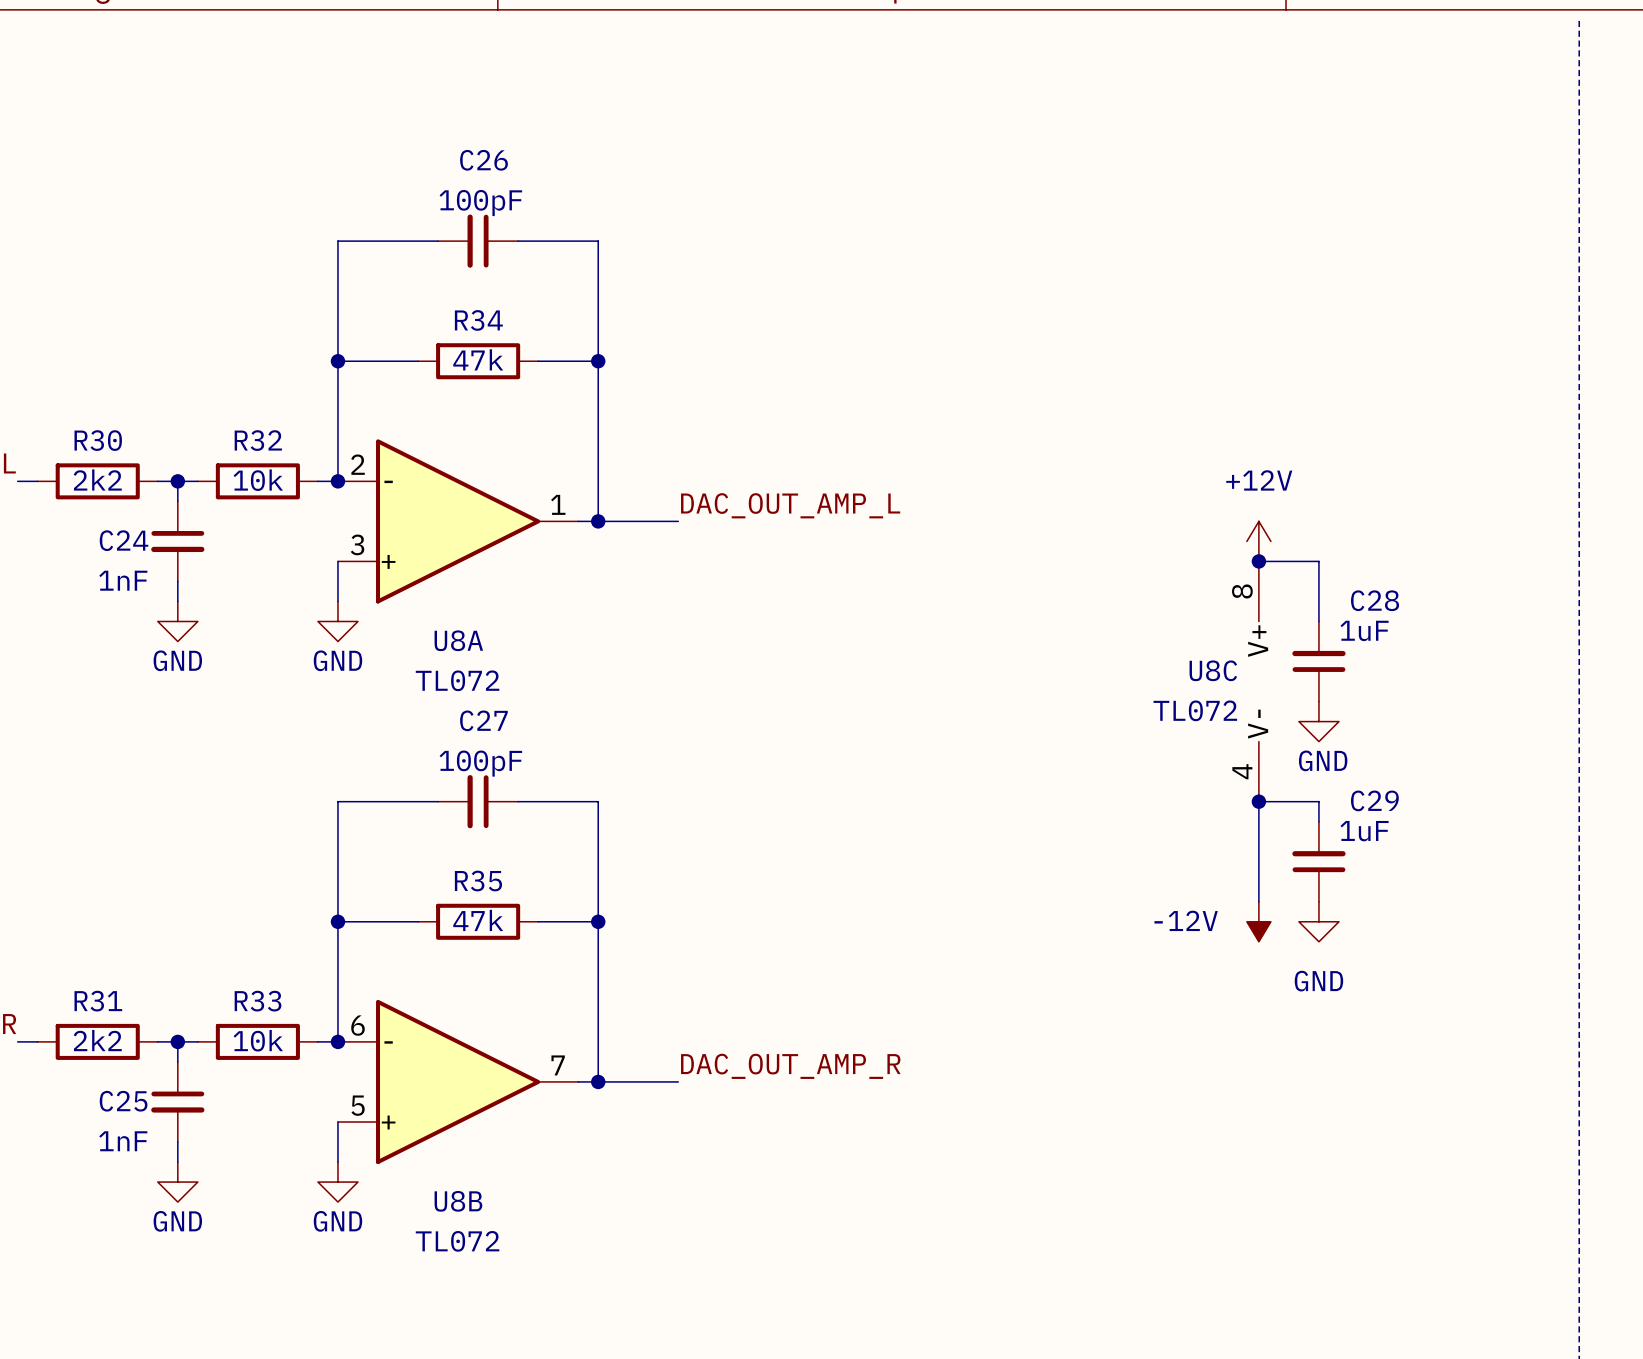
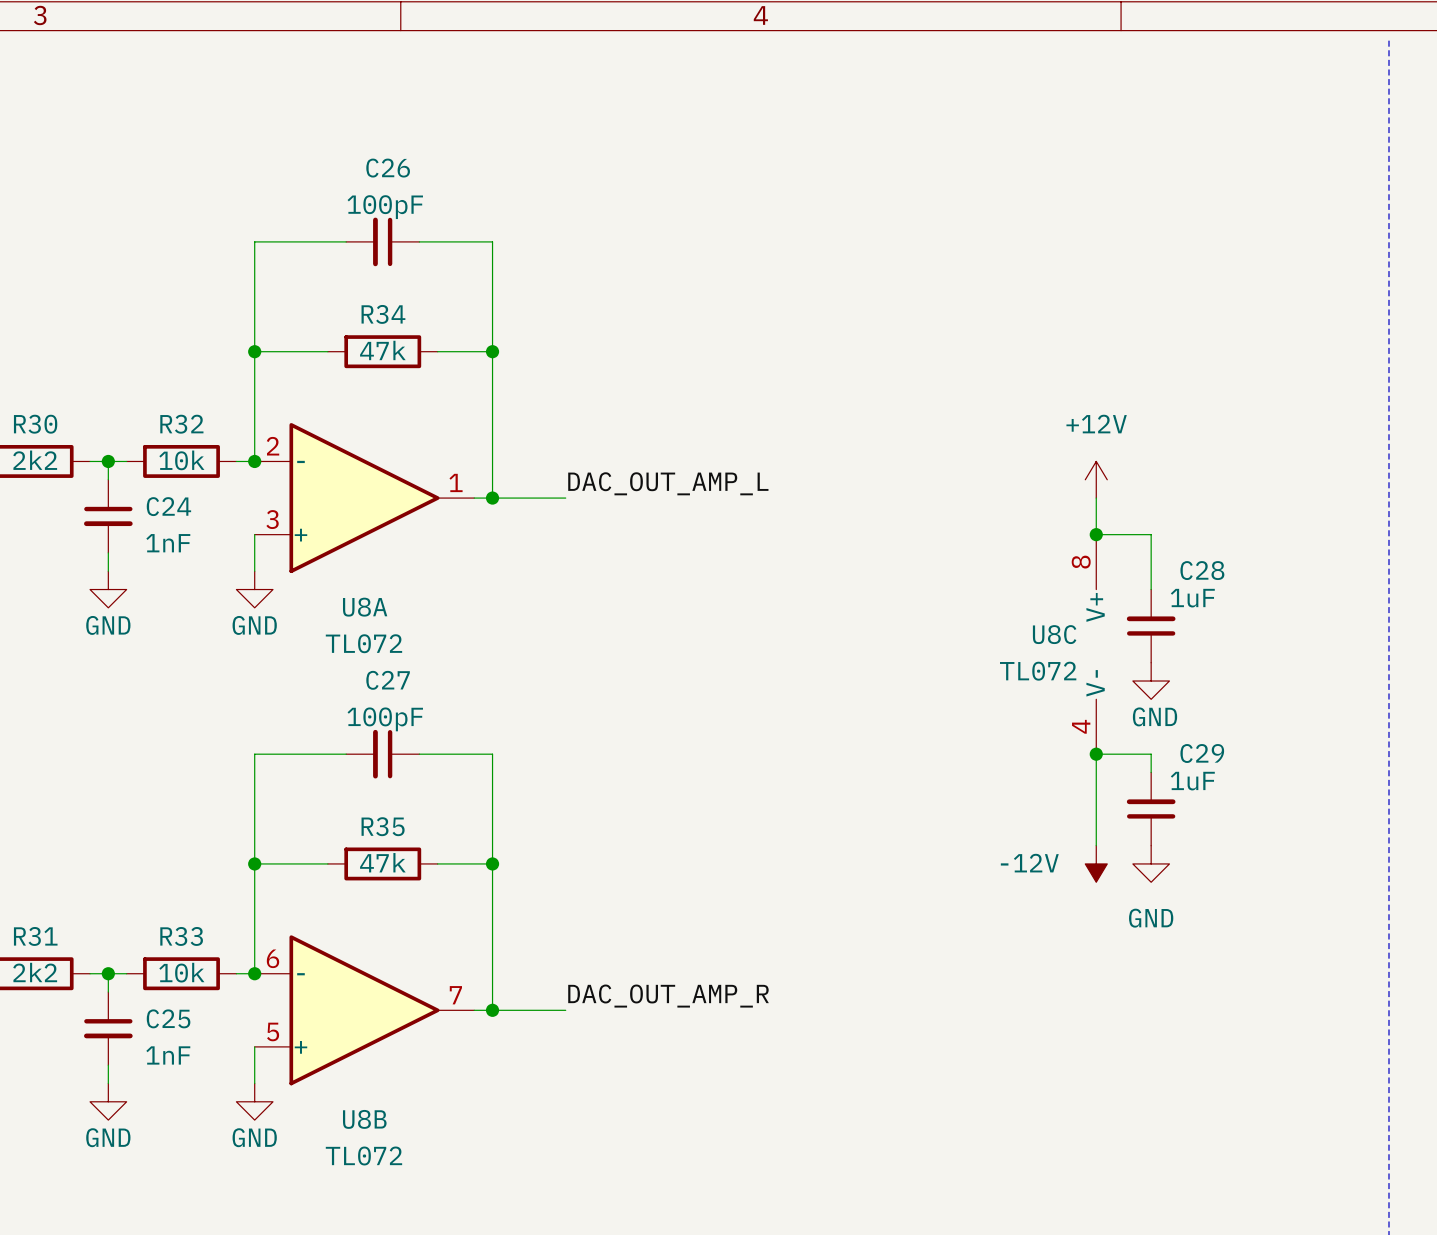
C24 name position: C24 (124, 540) -> C24 (168, 506)
power symbol position: +12V (1258, 541) -> +12V (1096, 479)
C24 value position: 1nF (123, 580) -> 1nF (168, 543)
C25 name position: C25 (123, 1101) -> C25 (168, 1018)
C25 value position: 1nF (123, 1141) -> 1nF (168, 1055)

